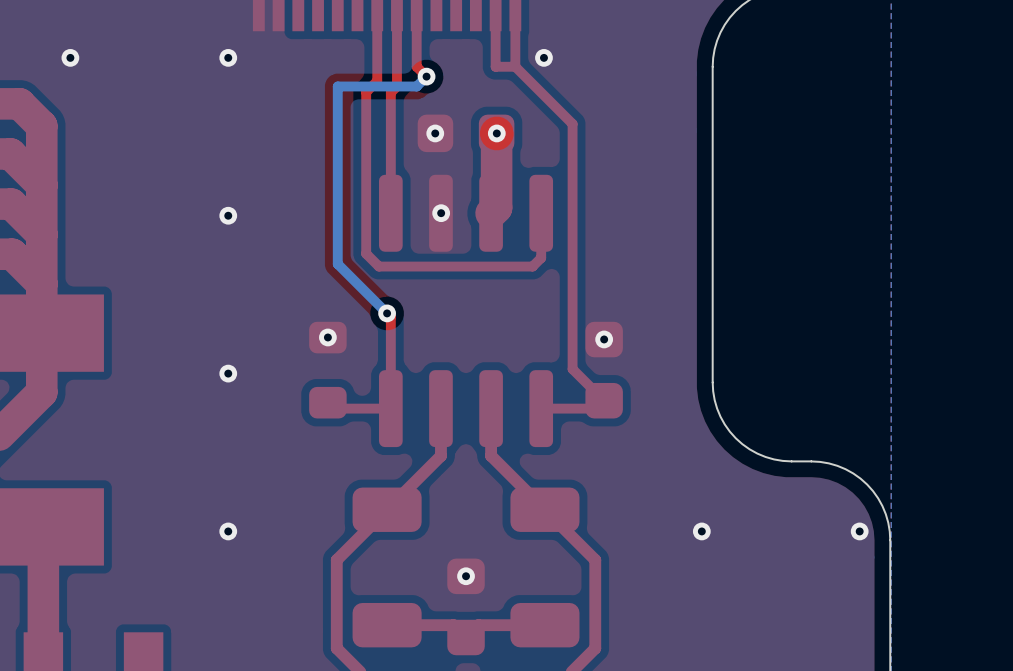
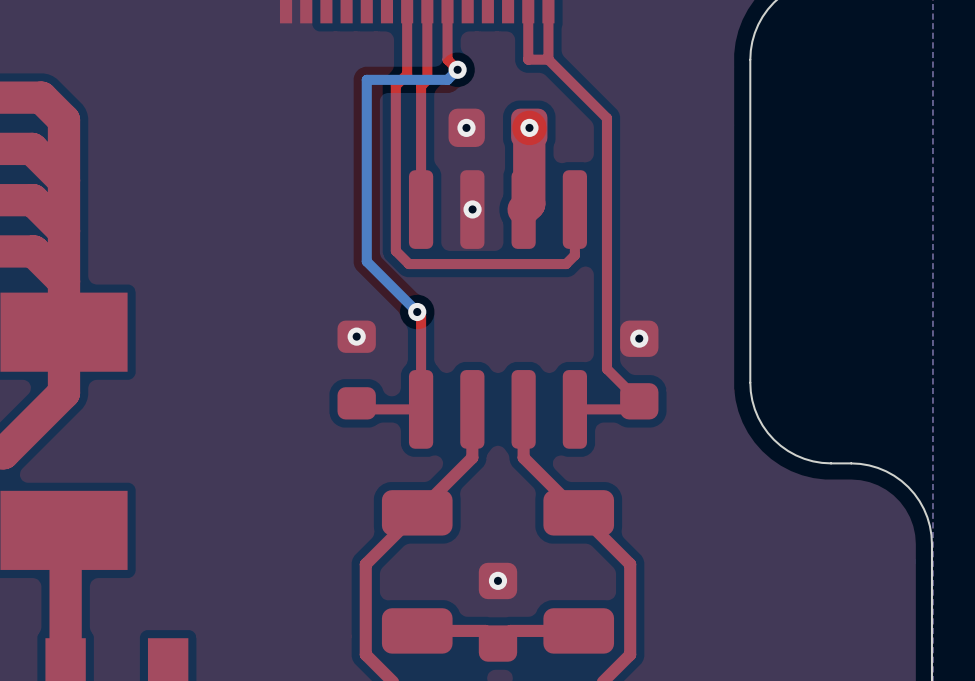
via: (70, 57) -> none
via: (228, 57) -> none
via: (543, 57) -> none
via: (228, 215) -> none
via: (228, 373) -> none
via: (228, 531) -> none
via: (701, 531) -> none
via: (859, 531) -> none

